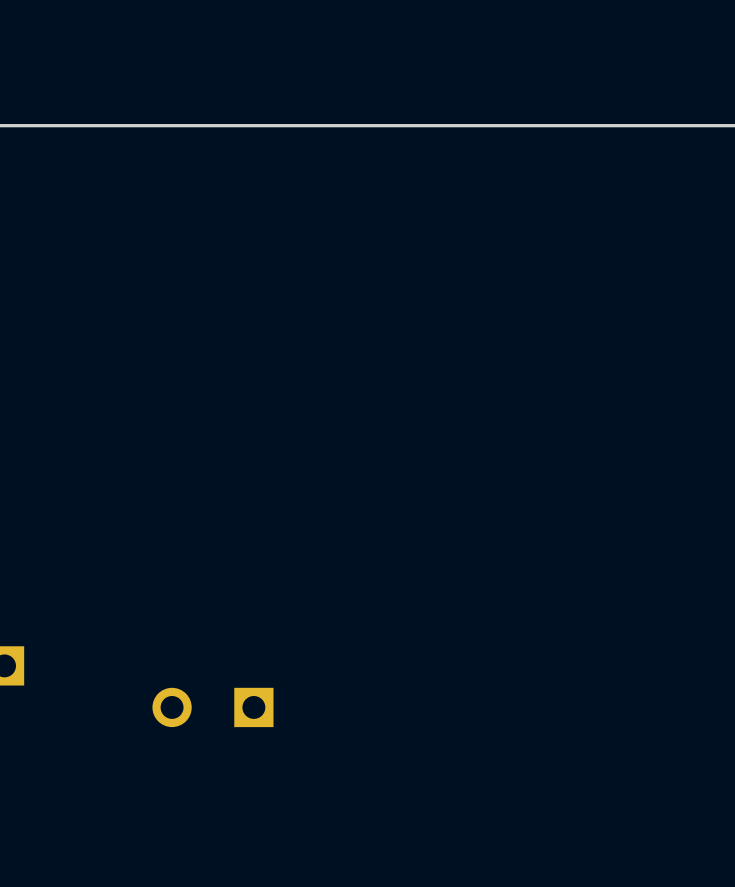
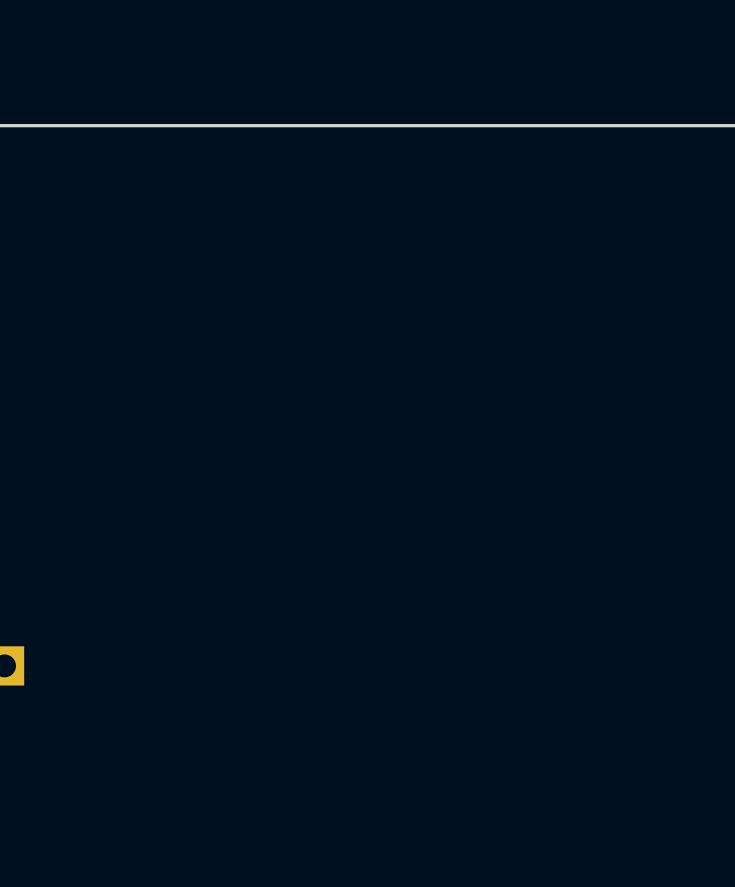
part: (212, 707) -> none

